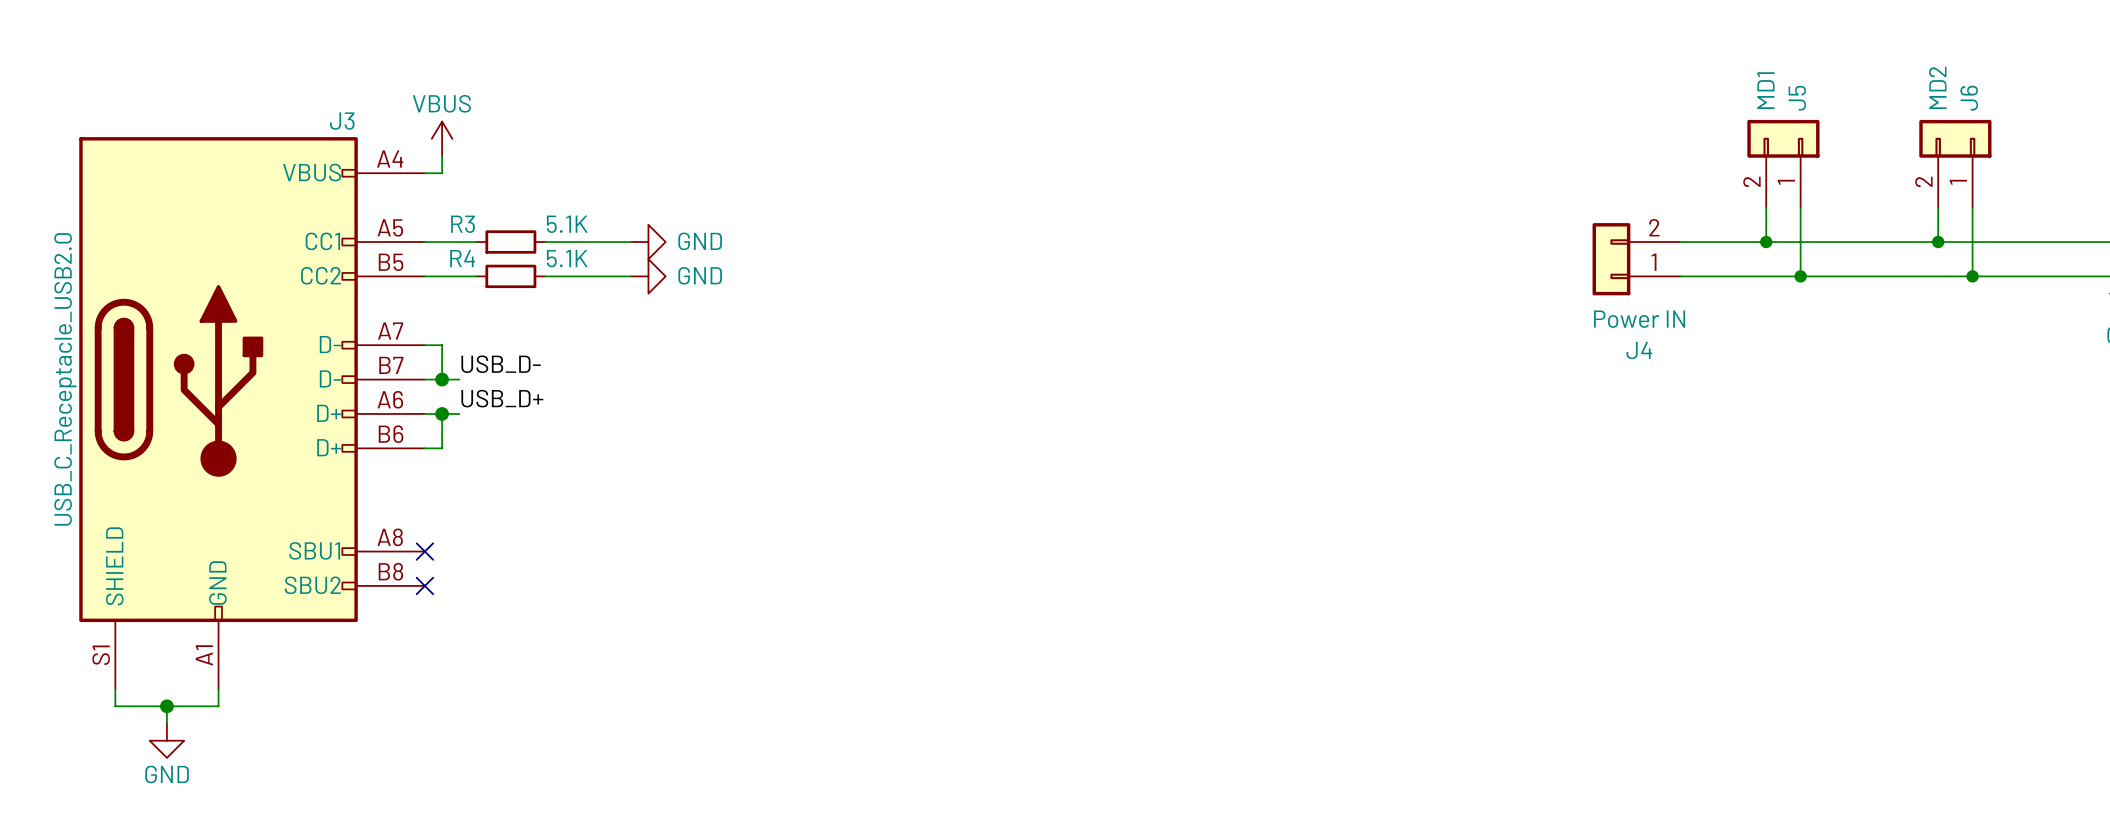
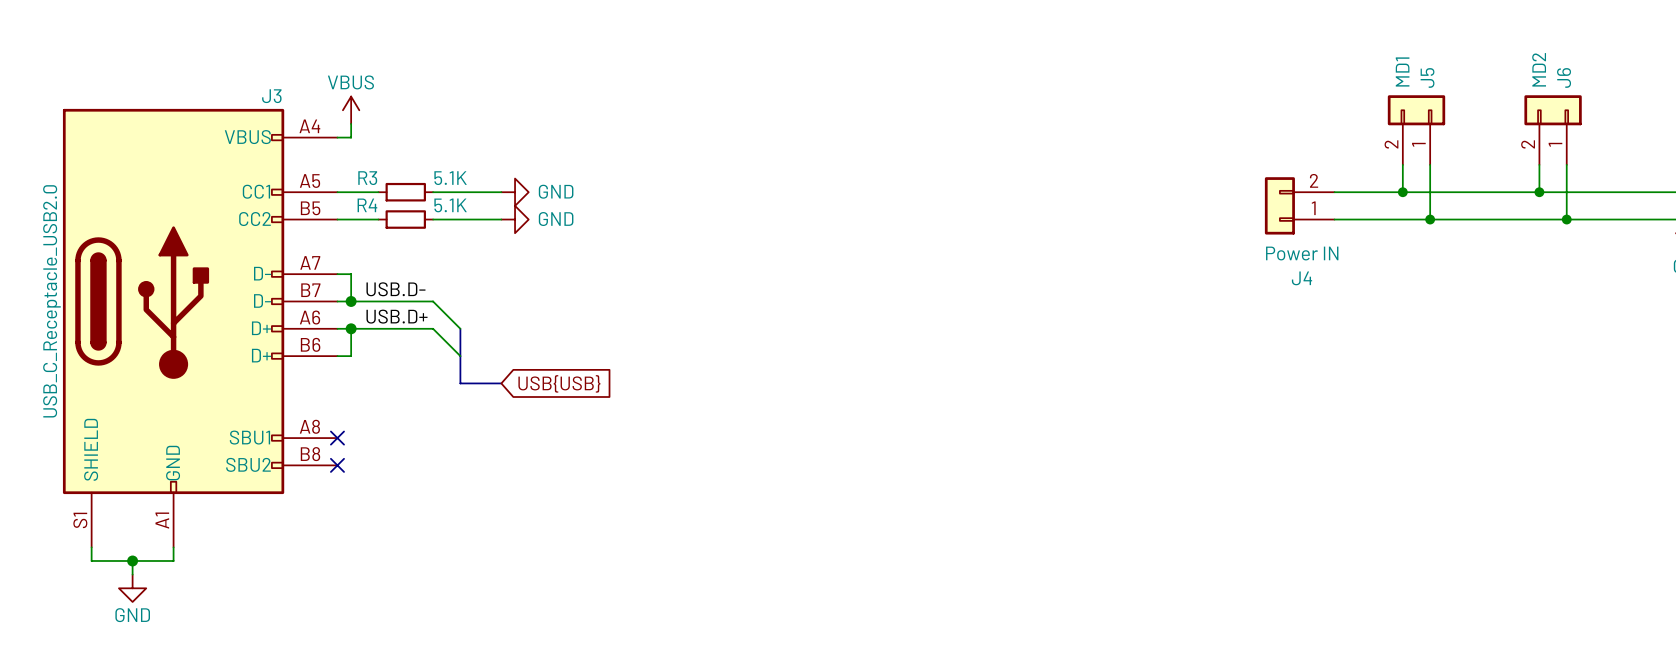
label: USB_D- (501, 364) -> USB.D- (395, 289)
wire: none -> (364, 301) (433, 301) (460, 328)
label: USB_D+ (502, 398) -> USB.D+ (397, 316)
wire: none -> (364, 328) (433, 328) (460, 356)
bus: none -> (460, 328) (460, 383) (501, 383)
global label: none -> USB{USB} (559, 383)

